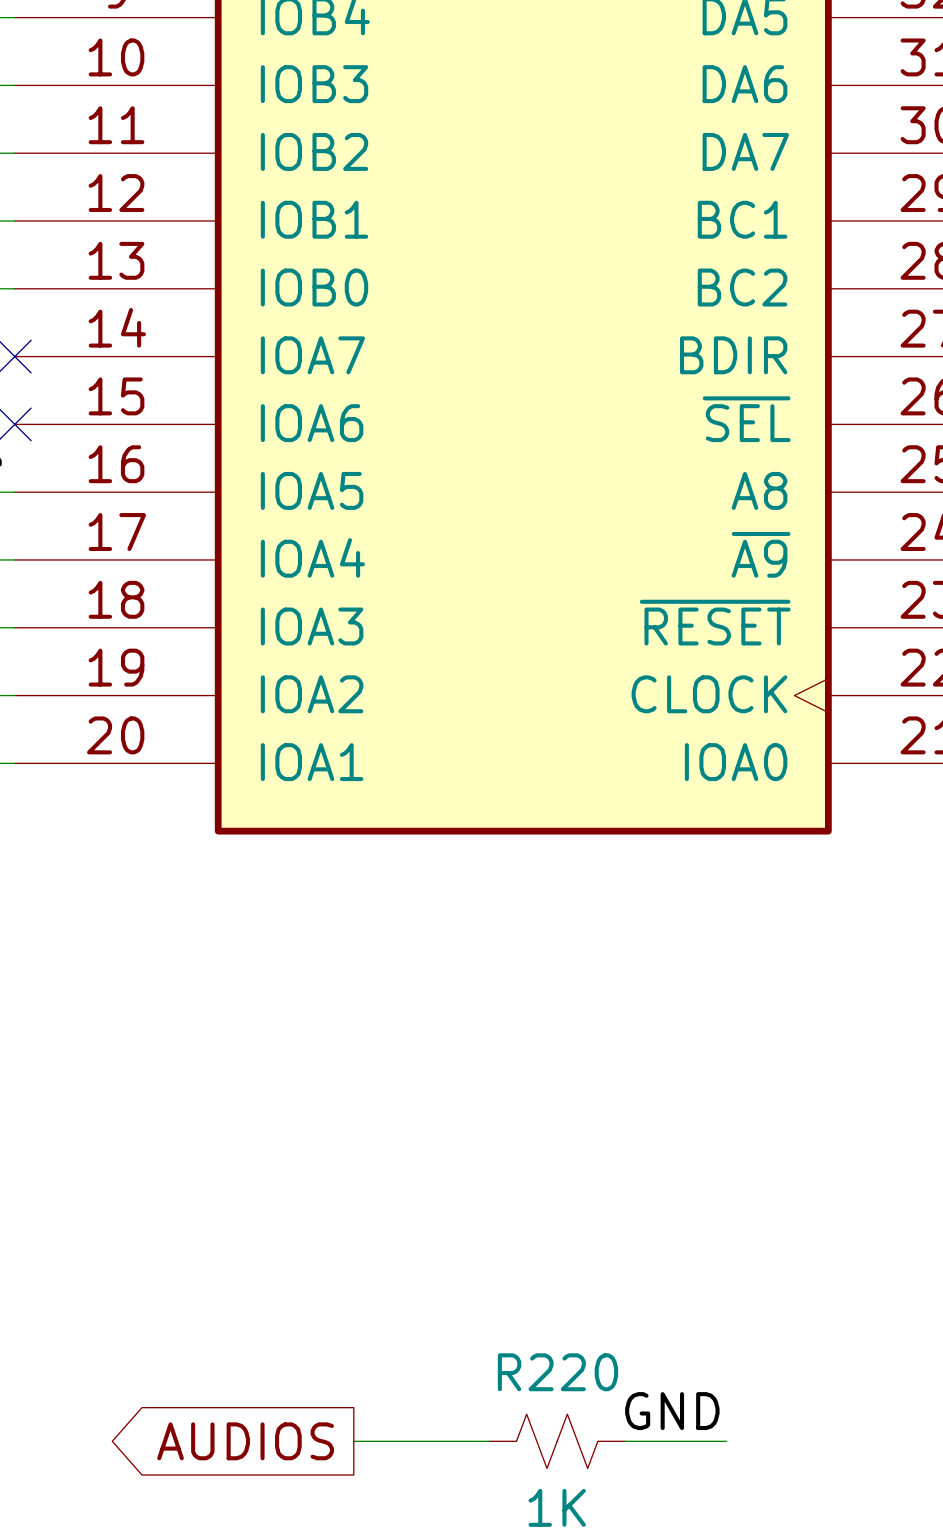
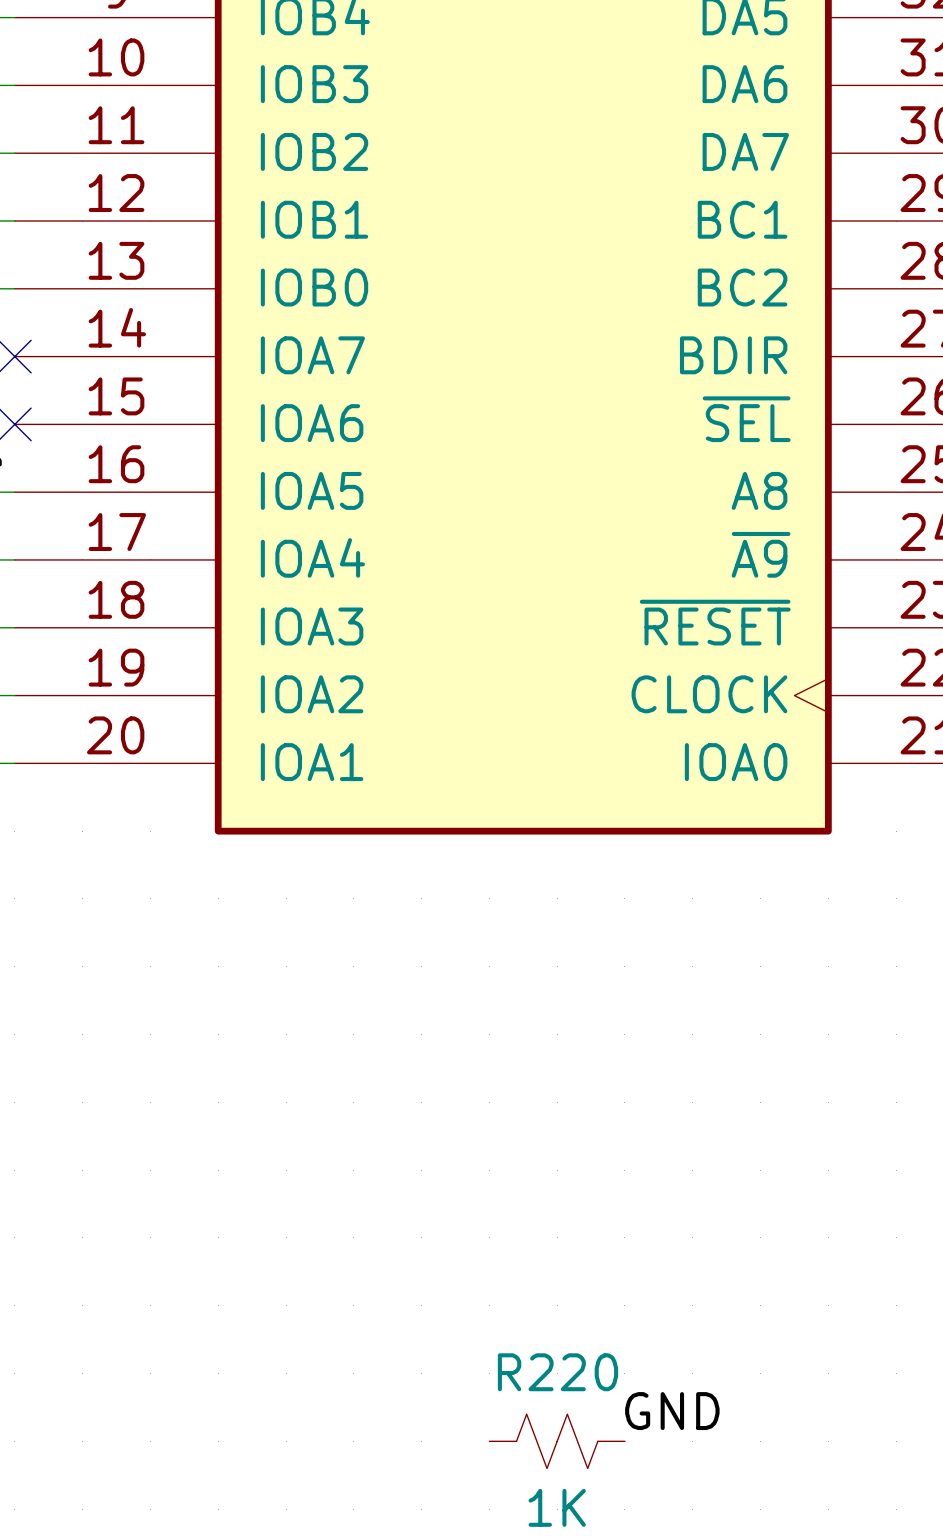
global label: AUDIOS (245, 1441) -> none
wire: (353, 1441) (489, 1441) -> none
wire: (624, 1441) (726, 1441) -> none

